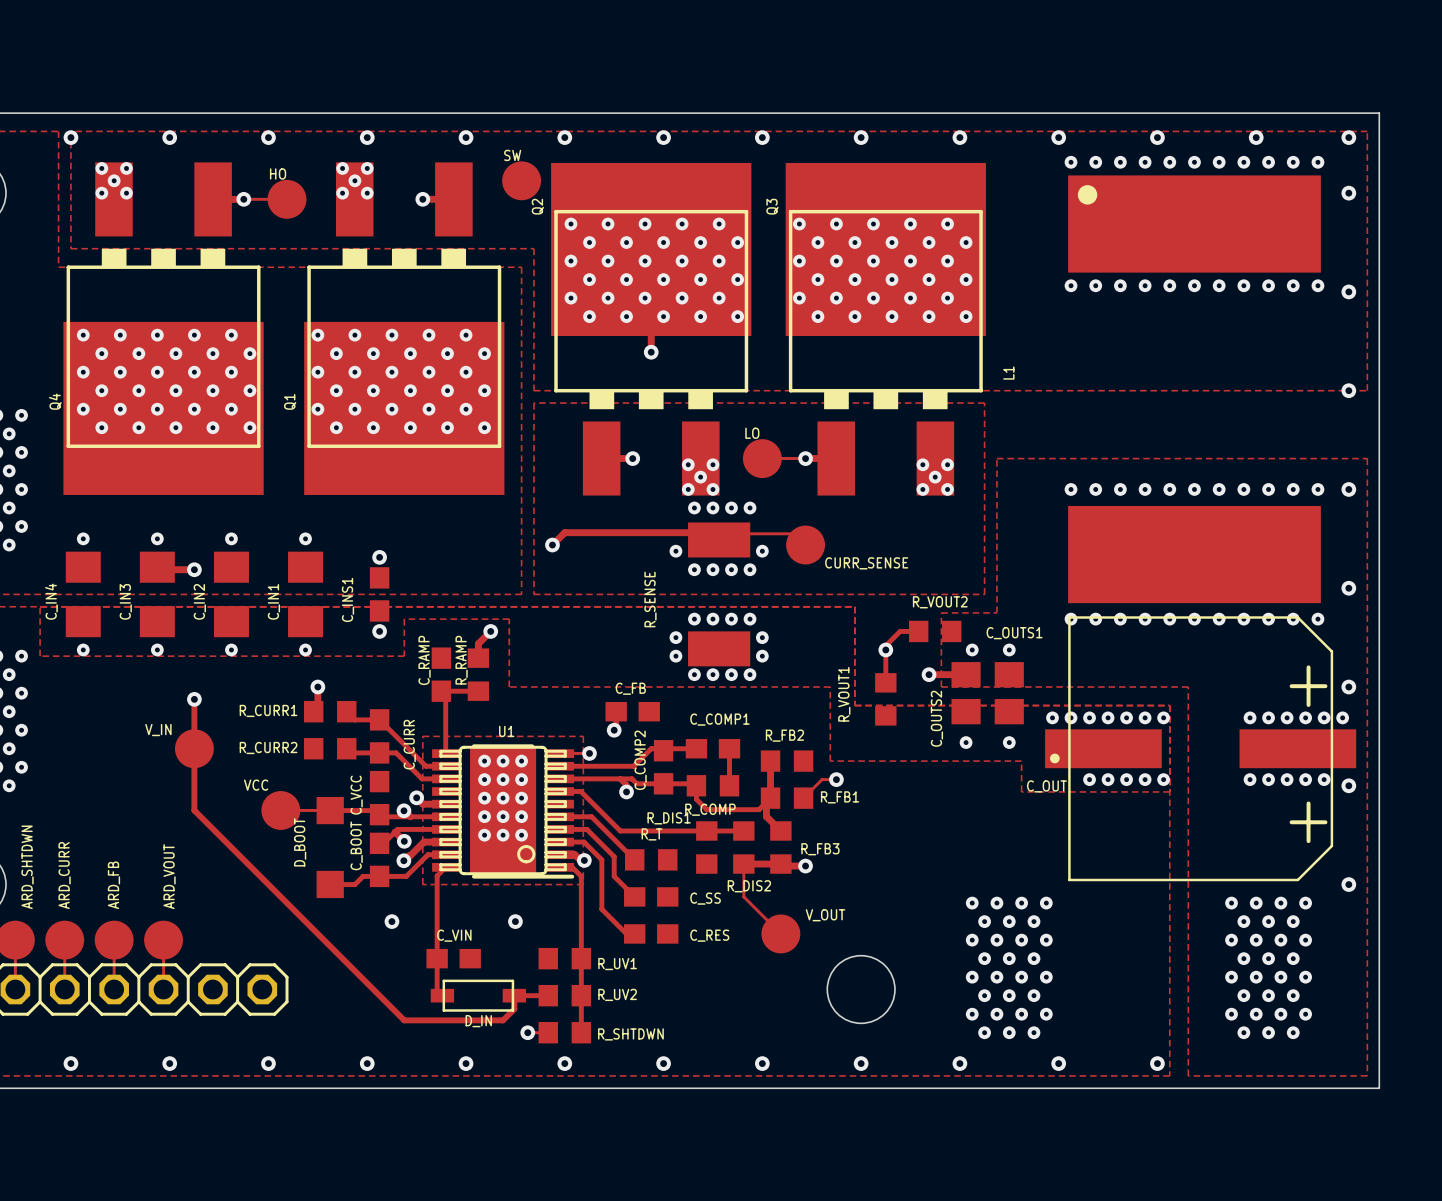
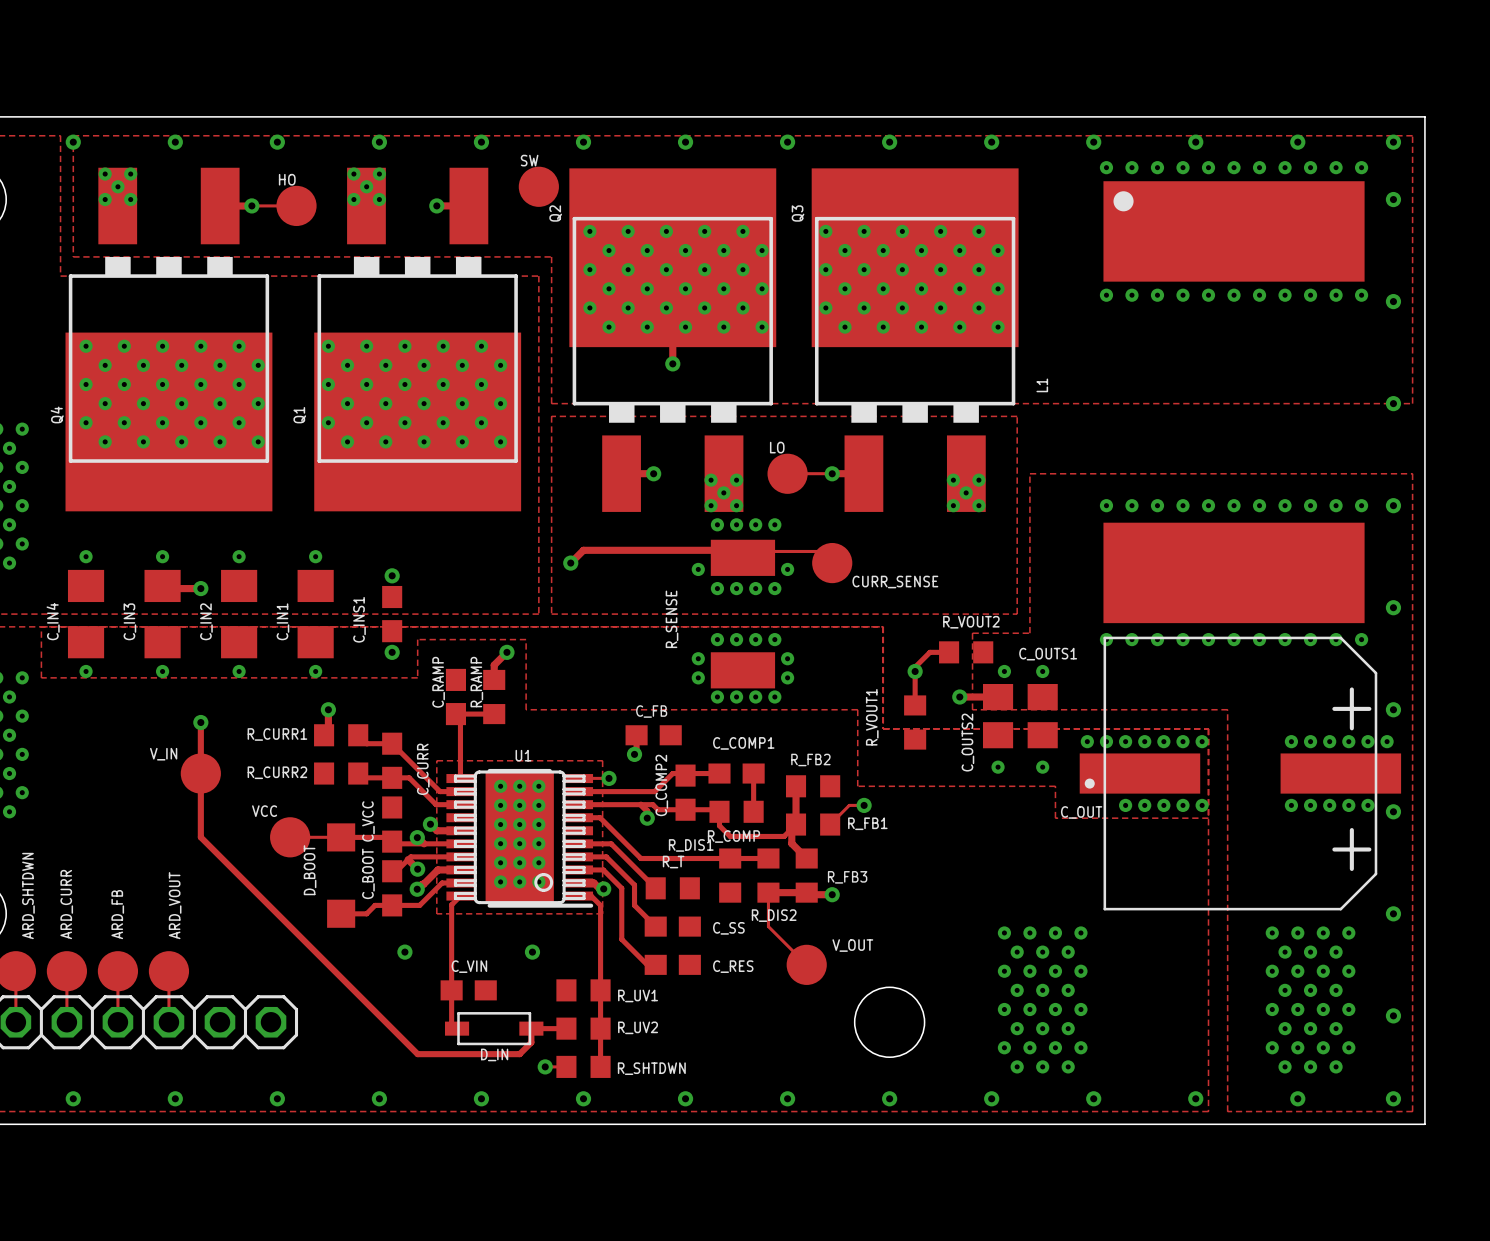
via: none -> (500, 881)
via: none -> (519, 881)
via: none -> (538, 881)
via: none -> (1393, 1015)
via: none -> (1297, 1098)
via: none -> (1393, 1098)

